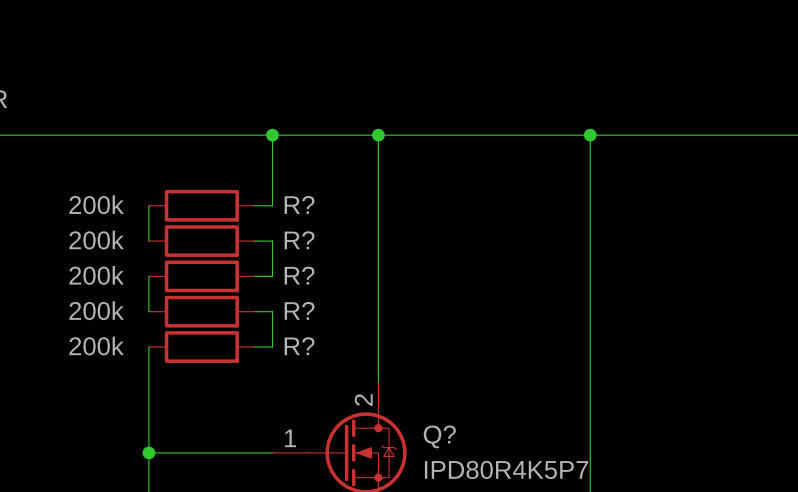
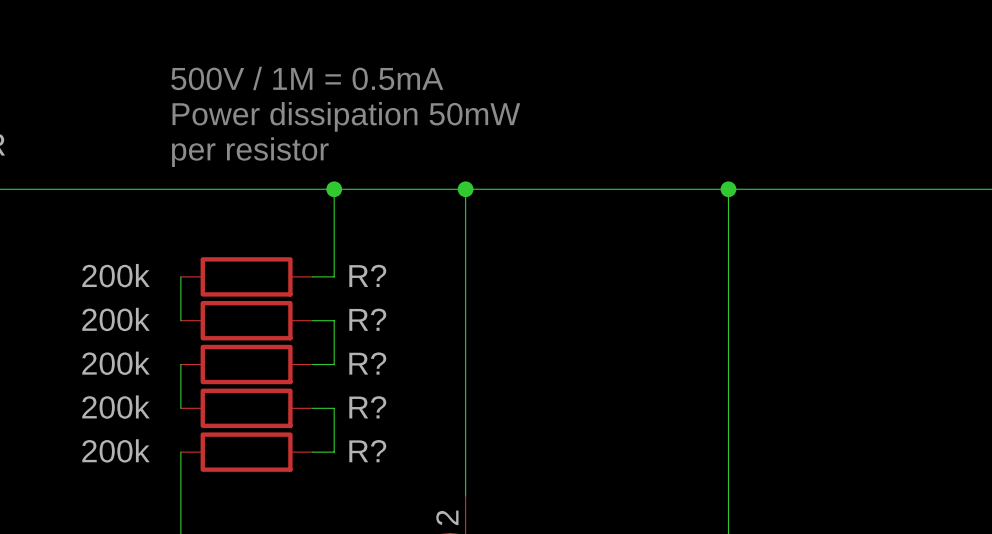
text: none -> 500V / 1M = 0.5mA (307, 78)
text: none -> Power dissipation 50mW (346, 116)
text: none -> per resistor (250, 152)

